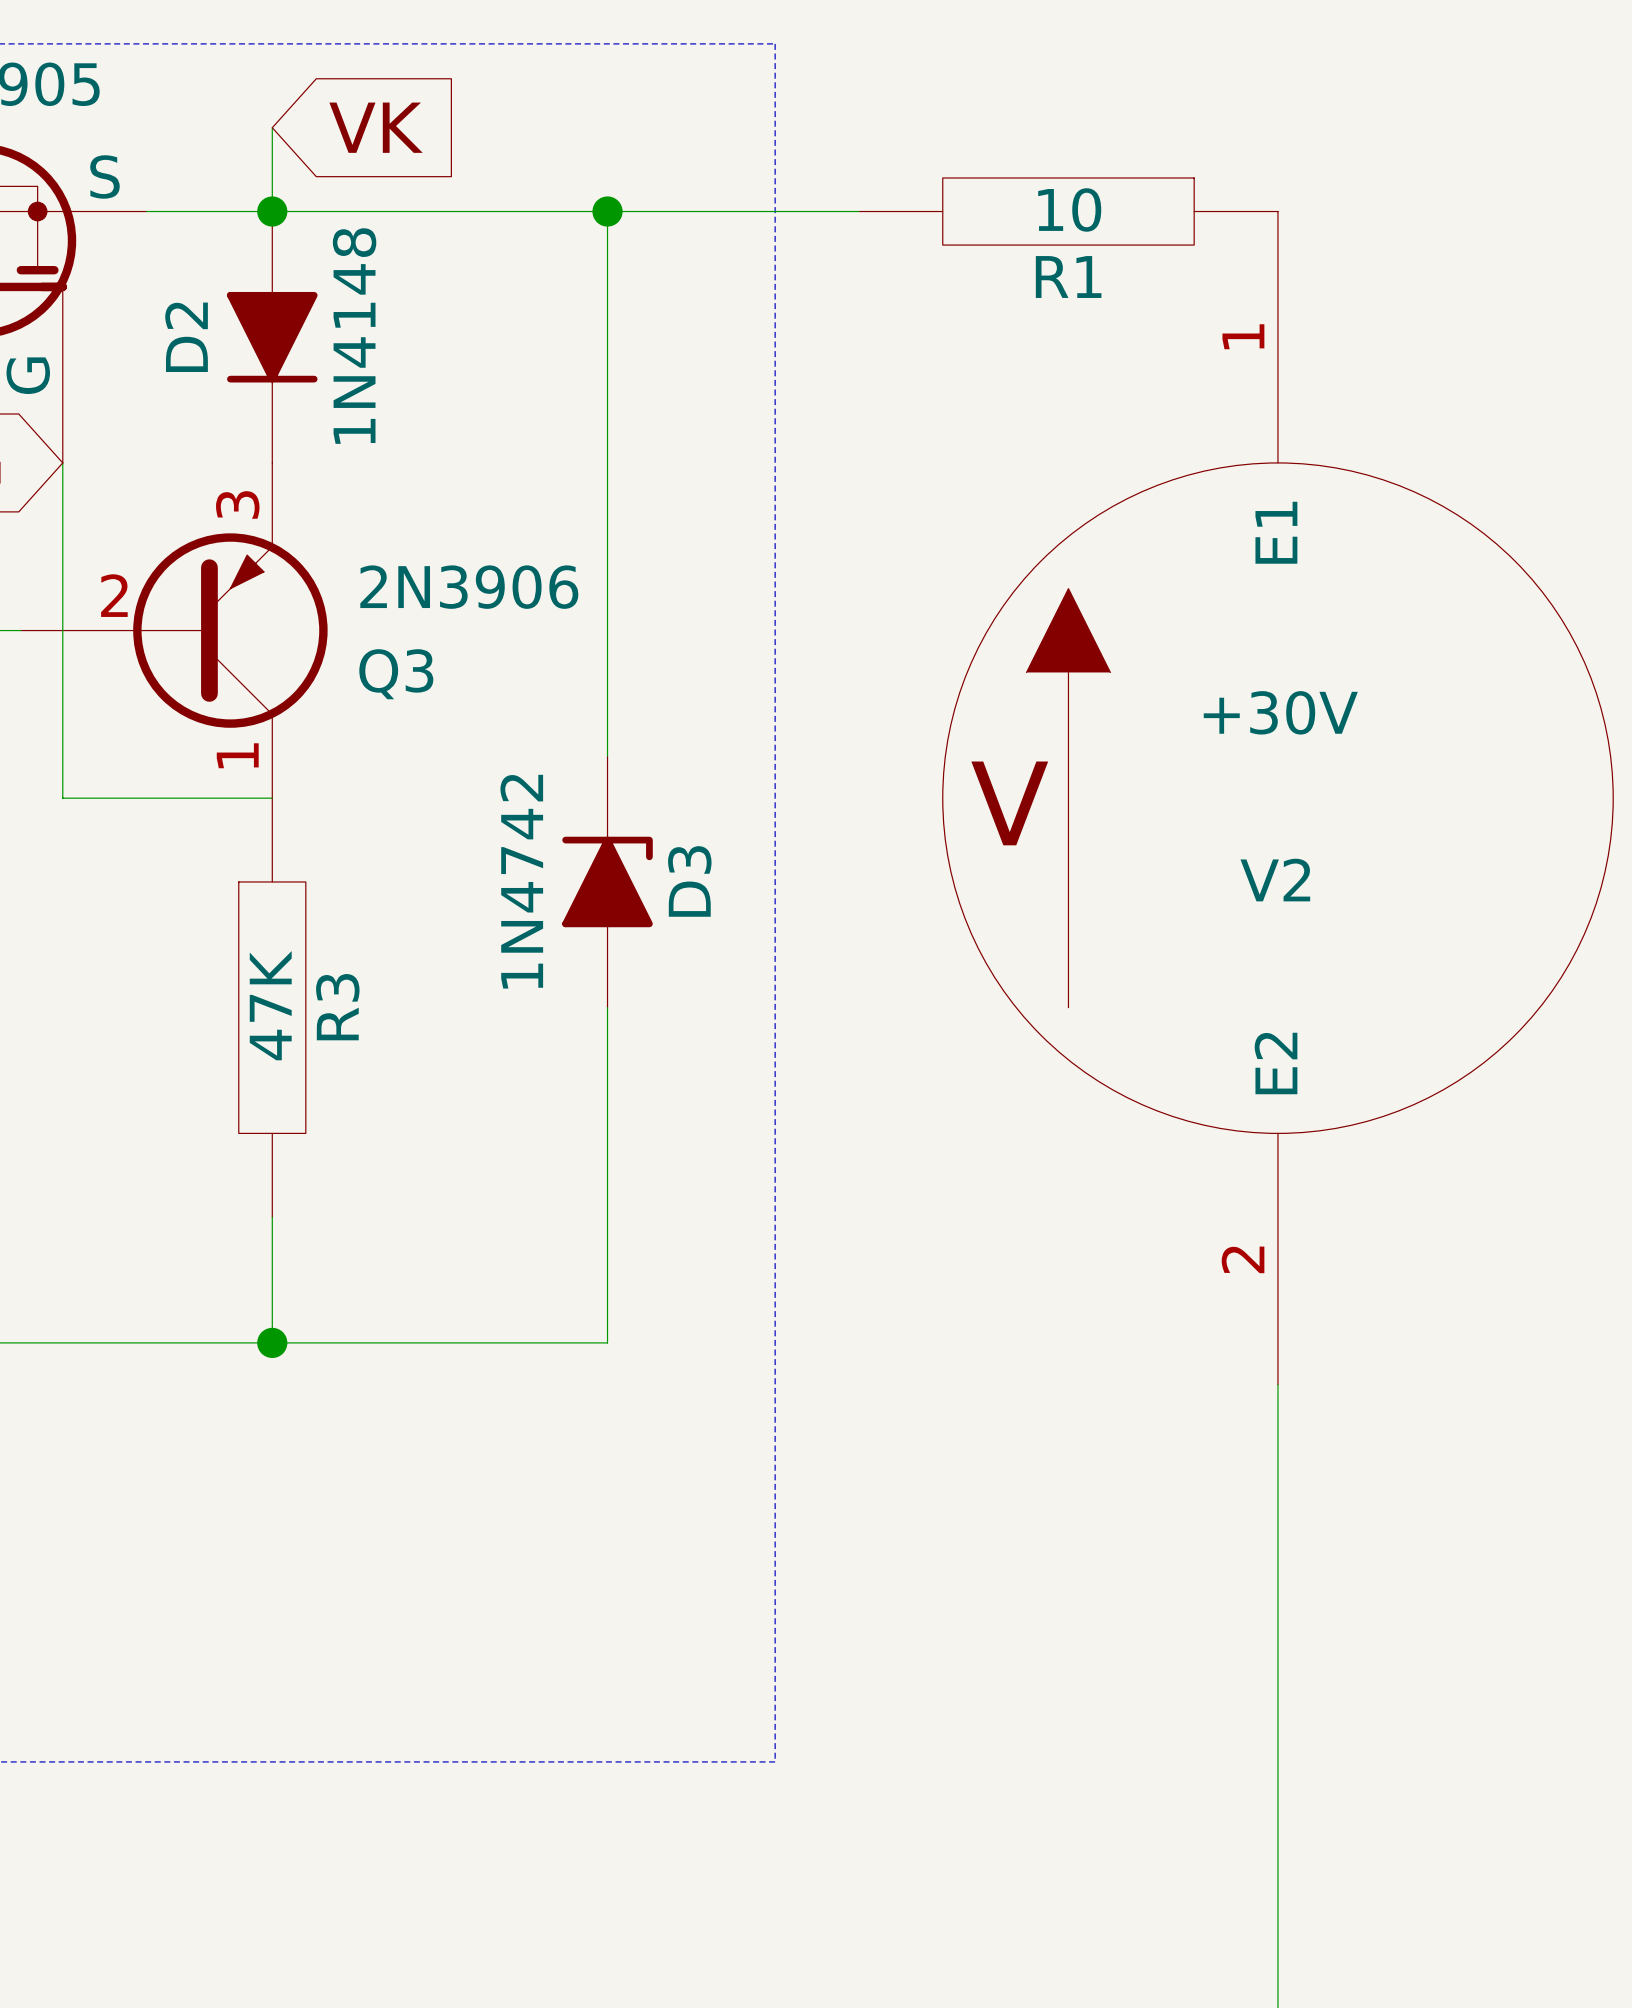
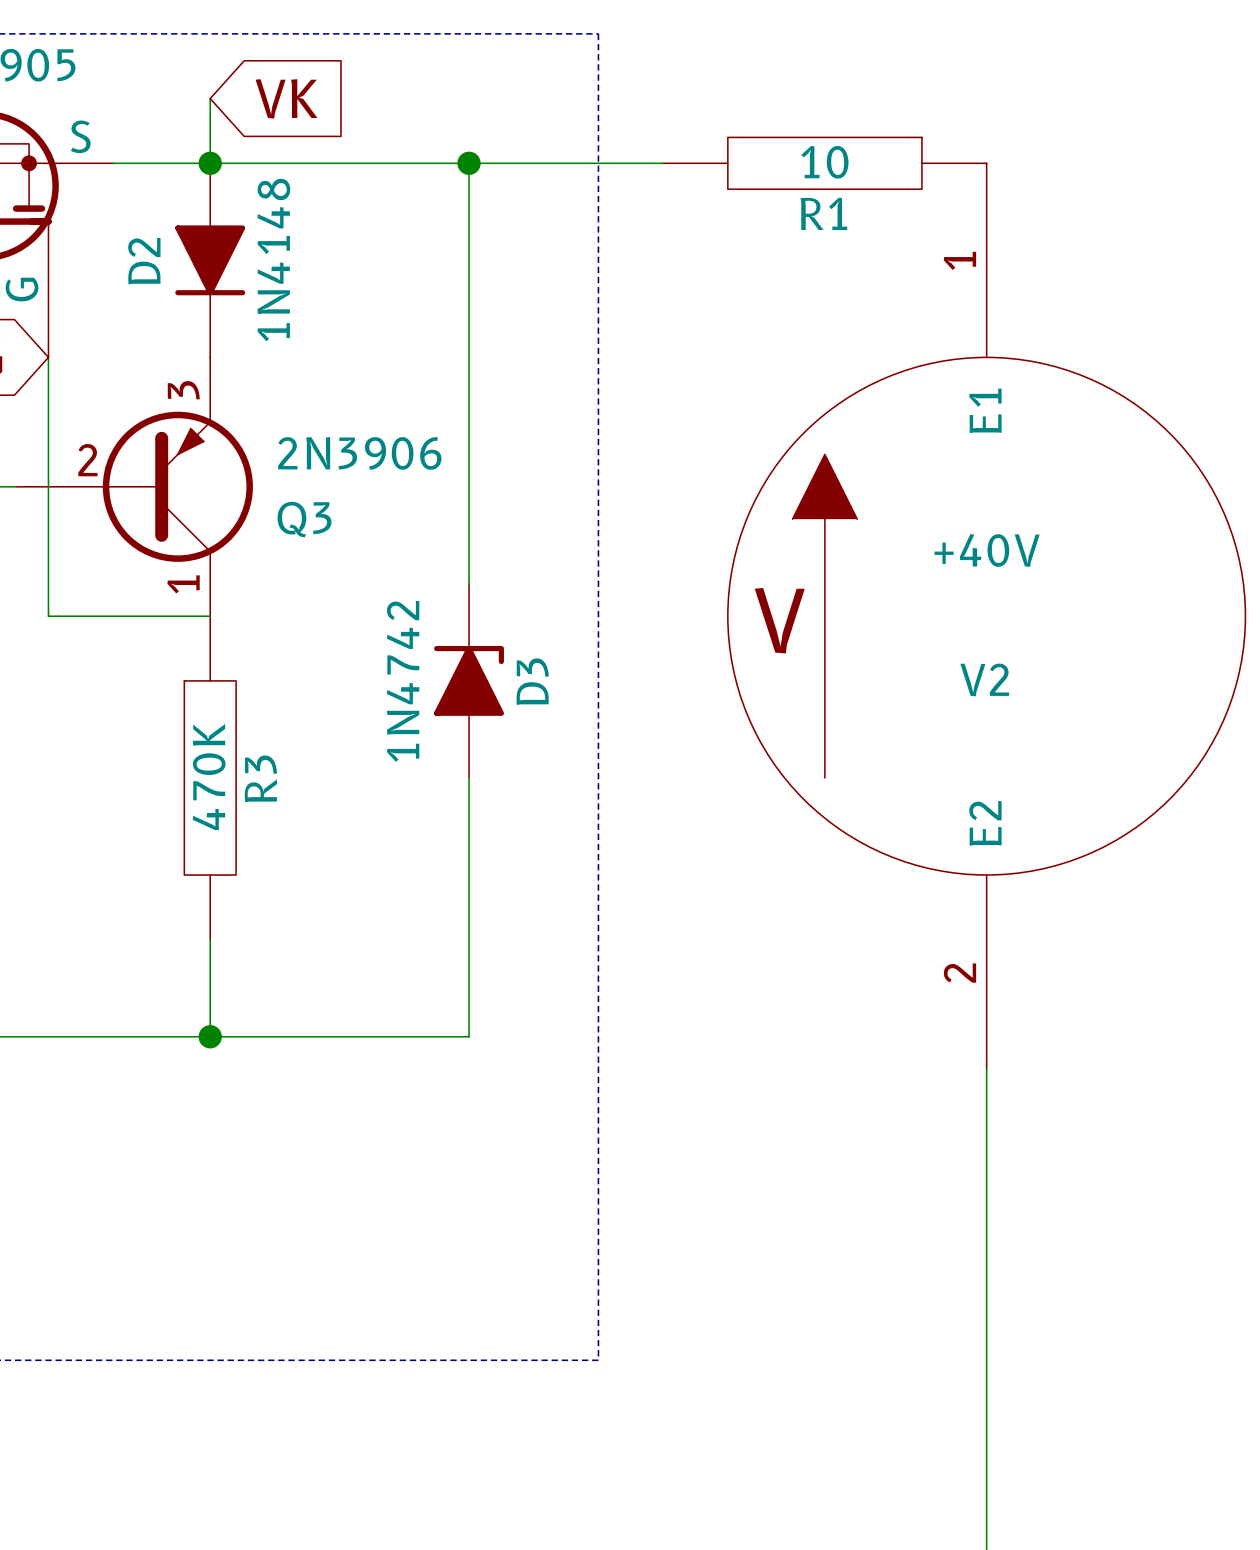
V2 value: +30V (1280, 712) -> +40V (987, 550)
R3 value: 47K (270, 1005) -> 470K (209, 777)

